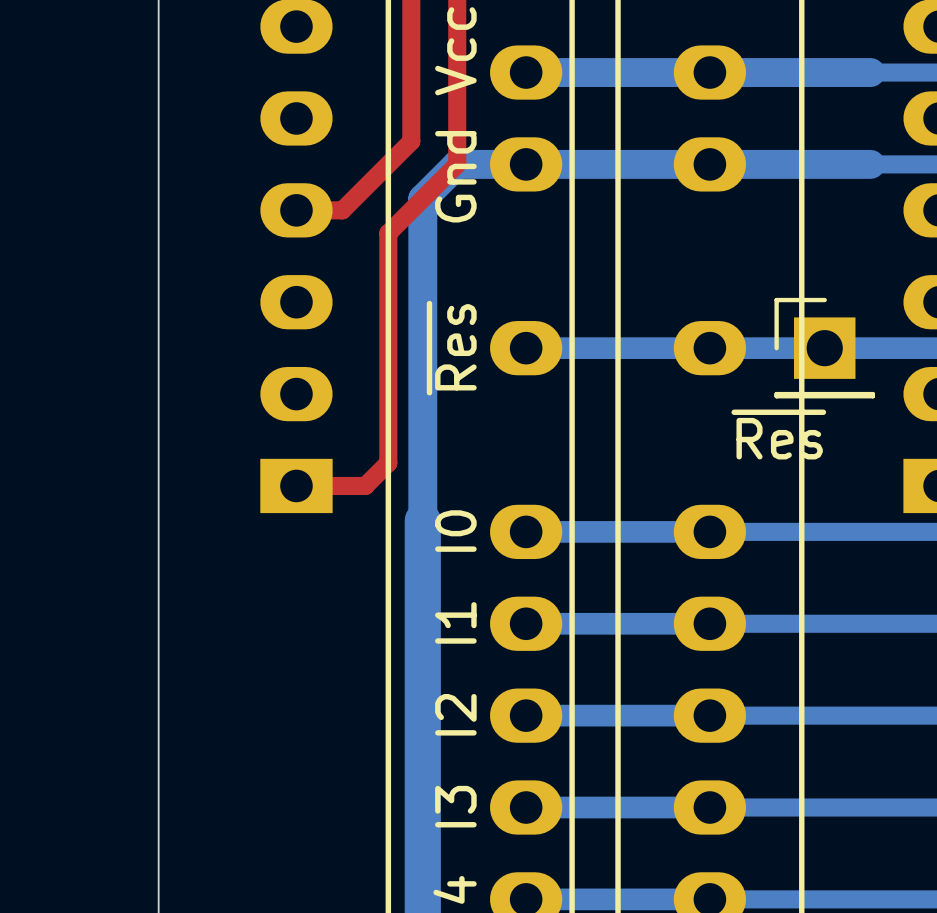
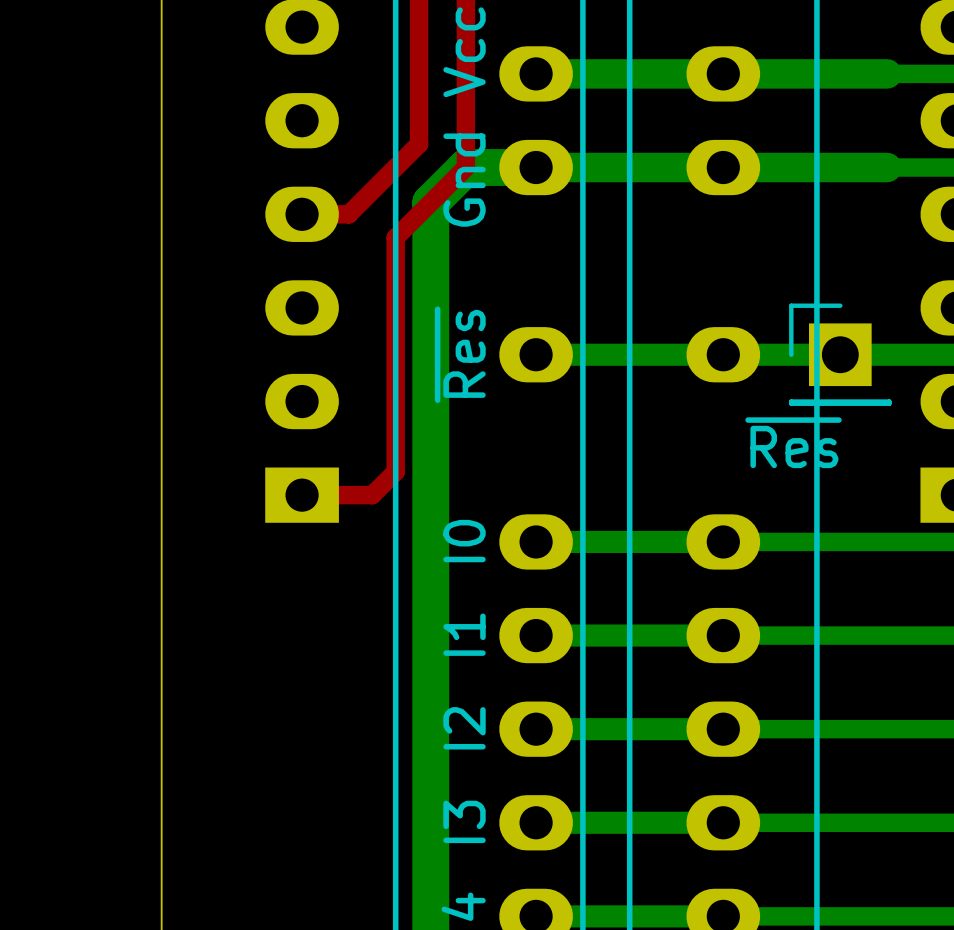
bottom track width: thin (526, 164) (457, 164) (422, 198) (422, 520) -> thick (536, 167) (465, 167) (430, 202) (430, 530)

